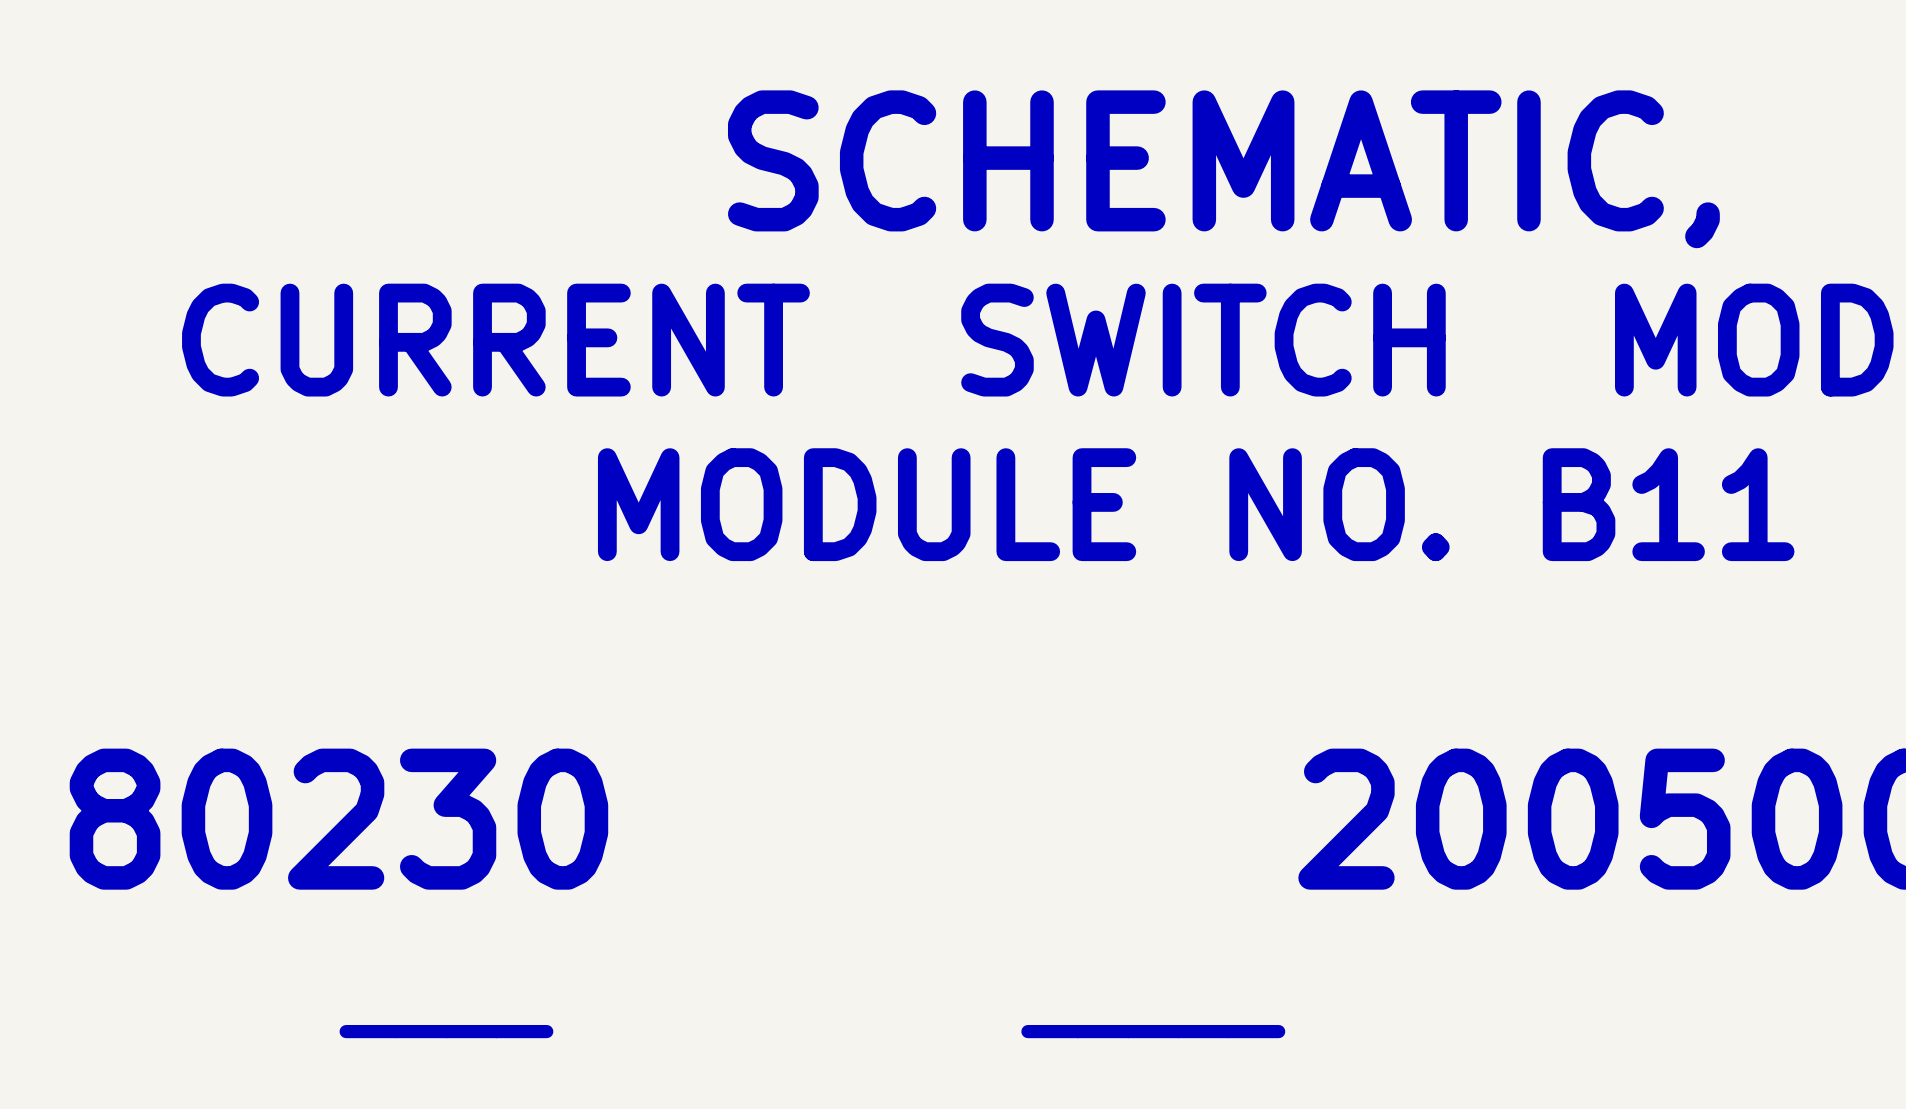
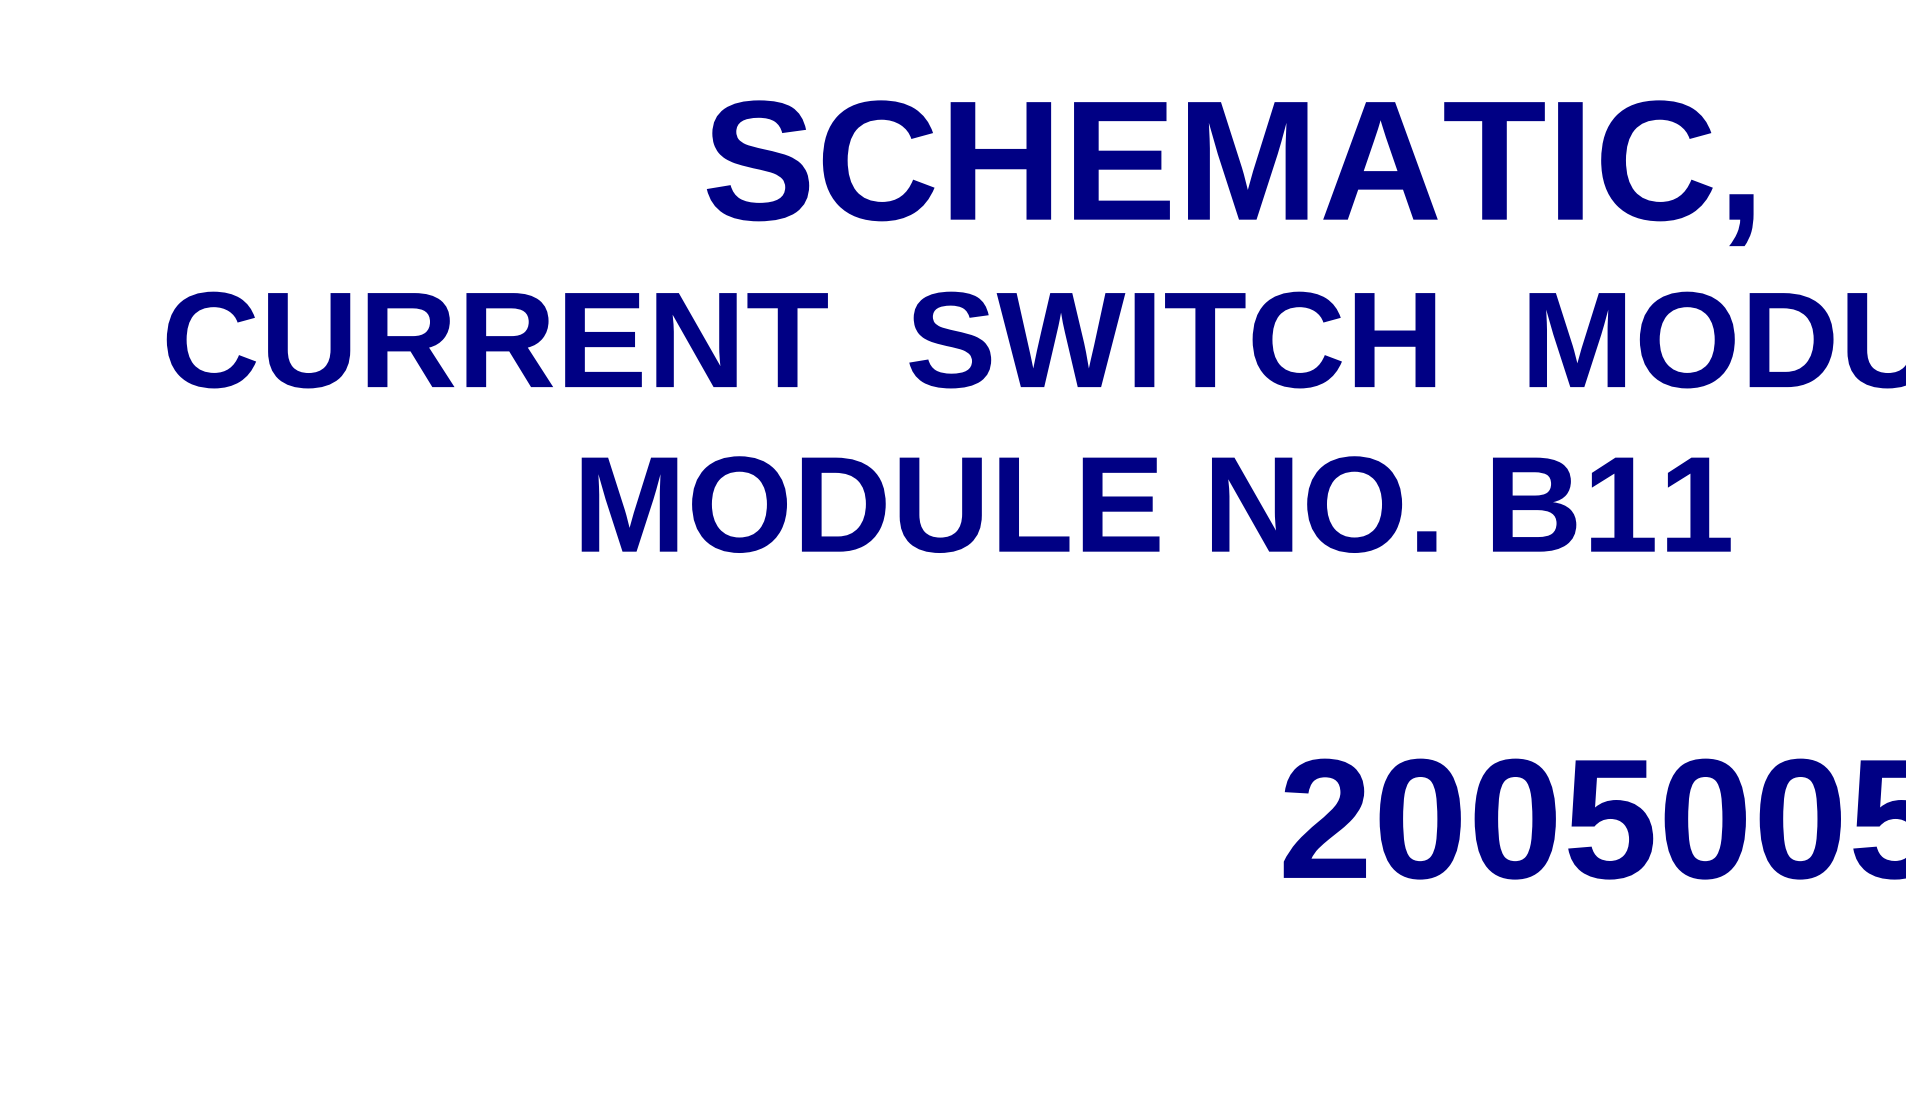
text: 80230 (338, 819) -> none
text: ____ (446, 1031) -> none
text: _____ (1153, 1031) -> none

